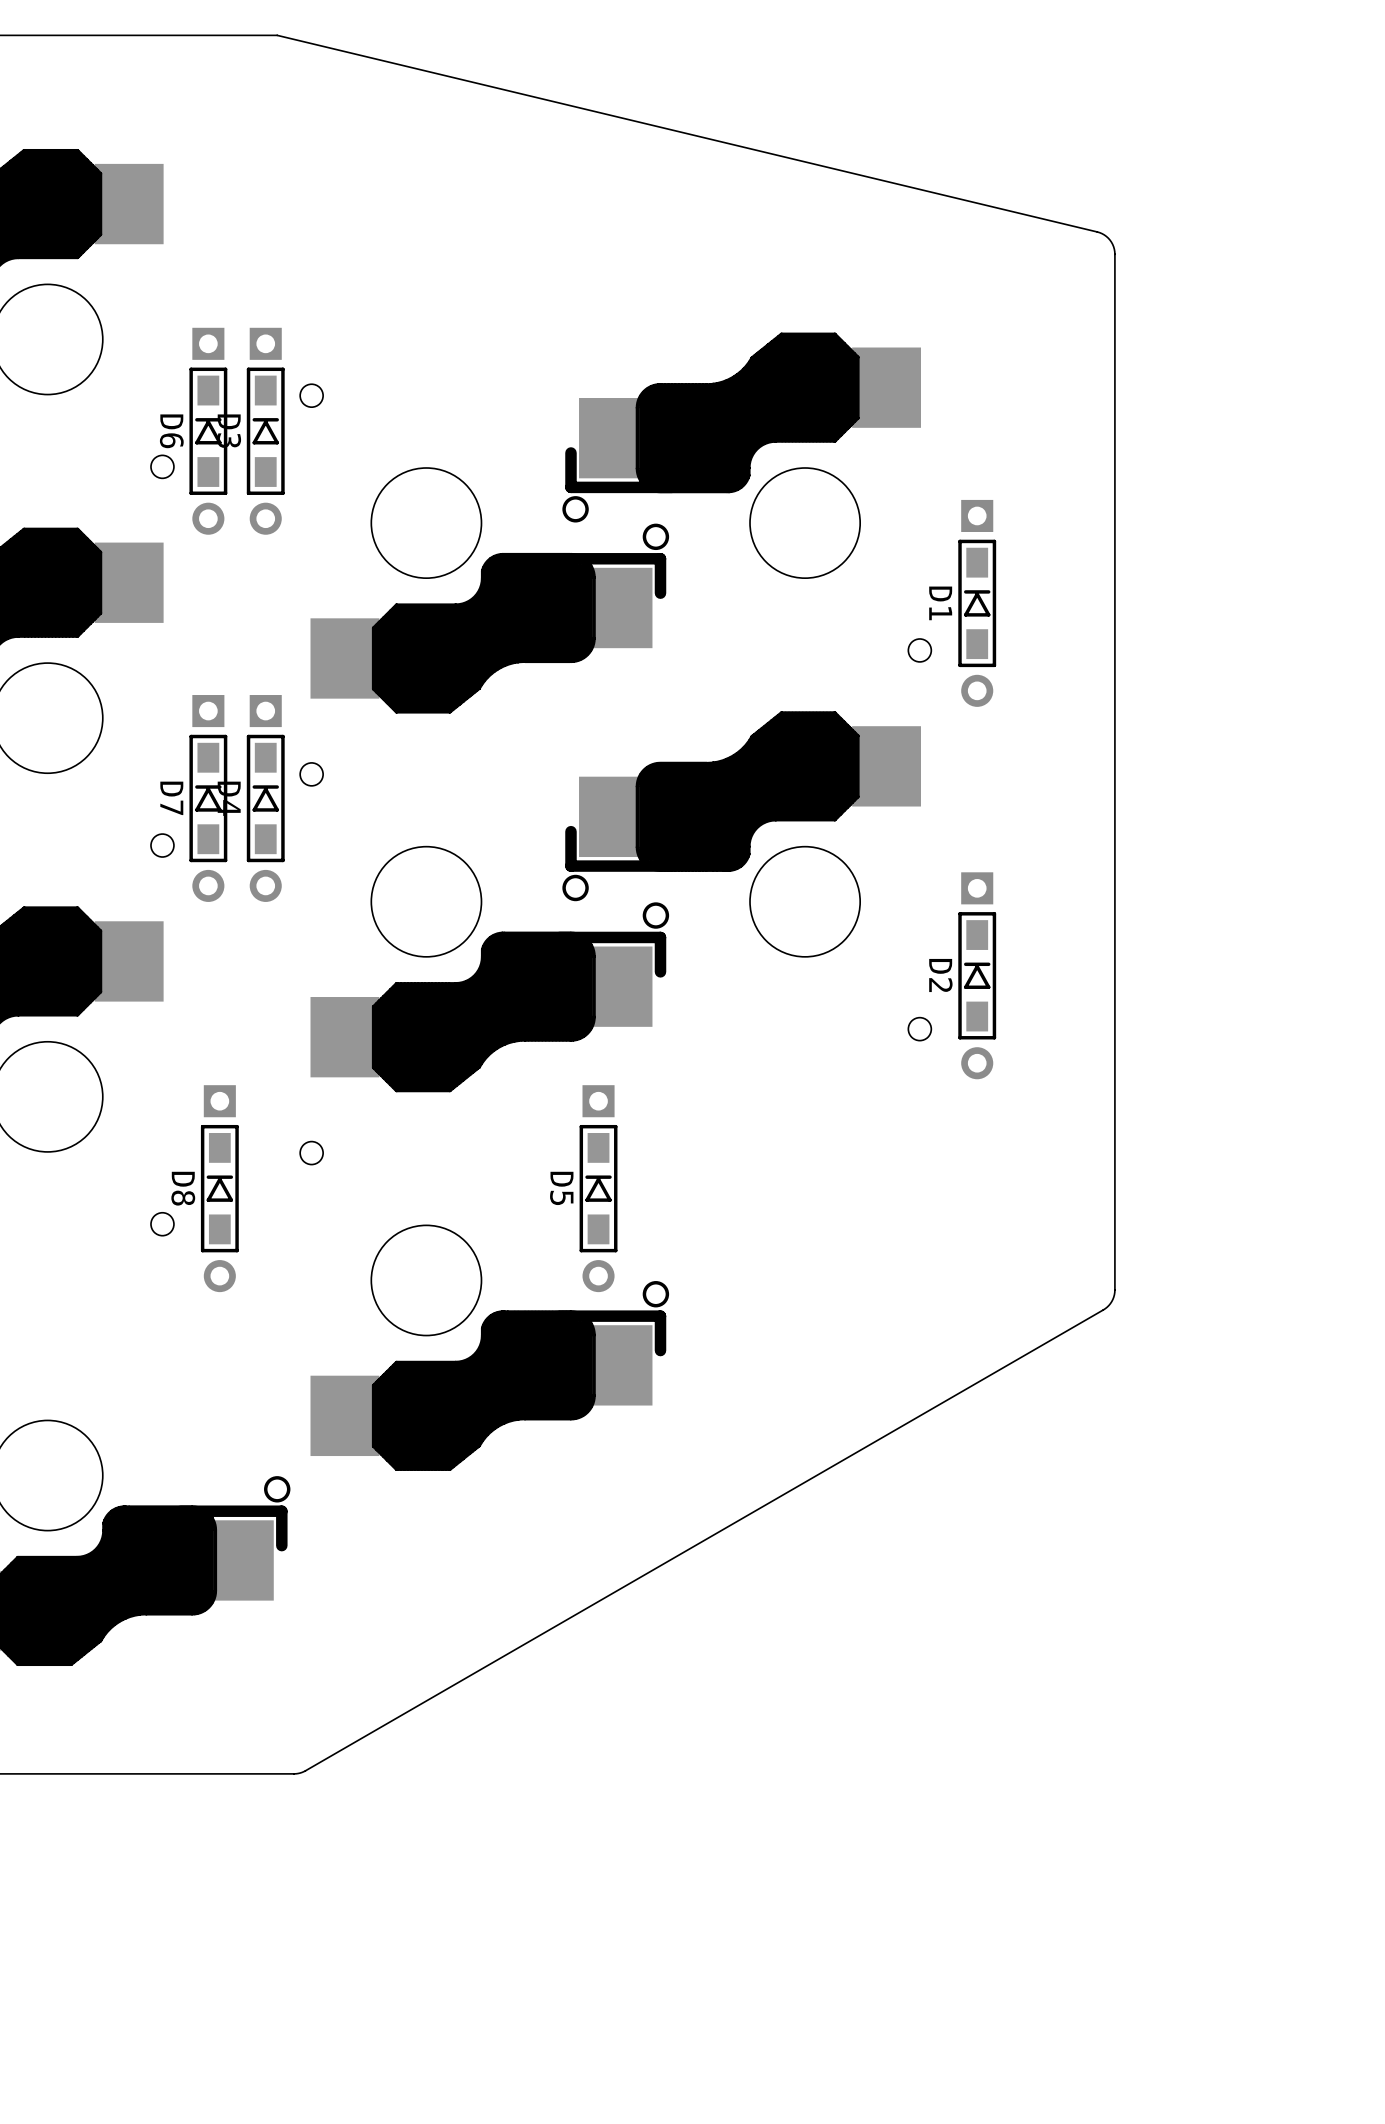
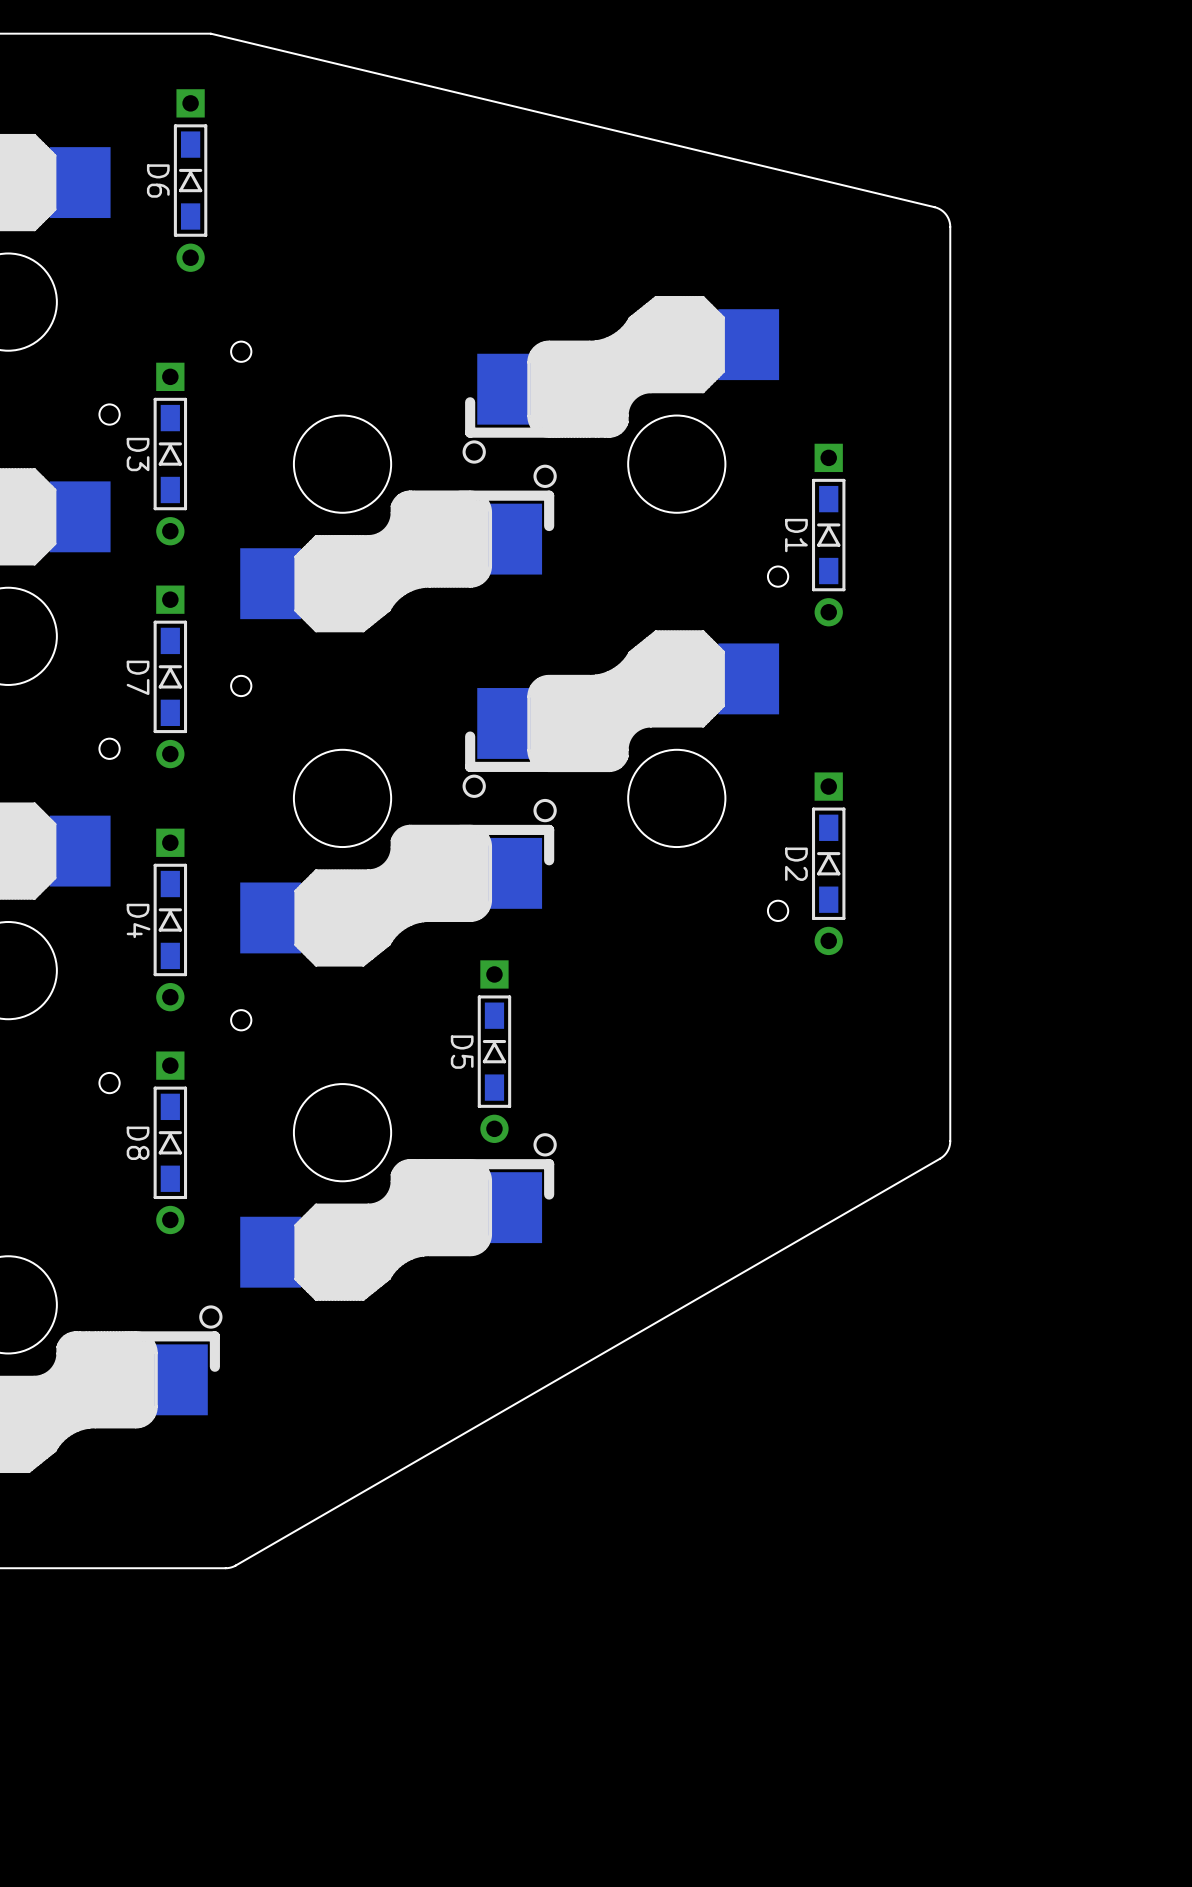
D6 position: (208, 431) -> (190, 180)
D3 position: (265, 431) -> (170, 454)
D7 position: (208, 798) -> (170, 676)
D4 position: (265, 798) -> (170, 919)
D8 position: (219, 1188) -> (170, 1142)

